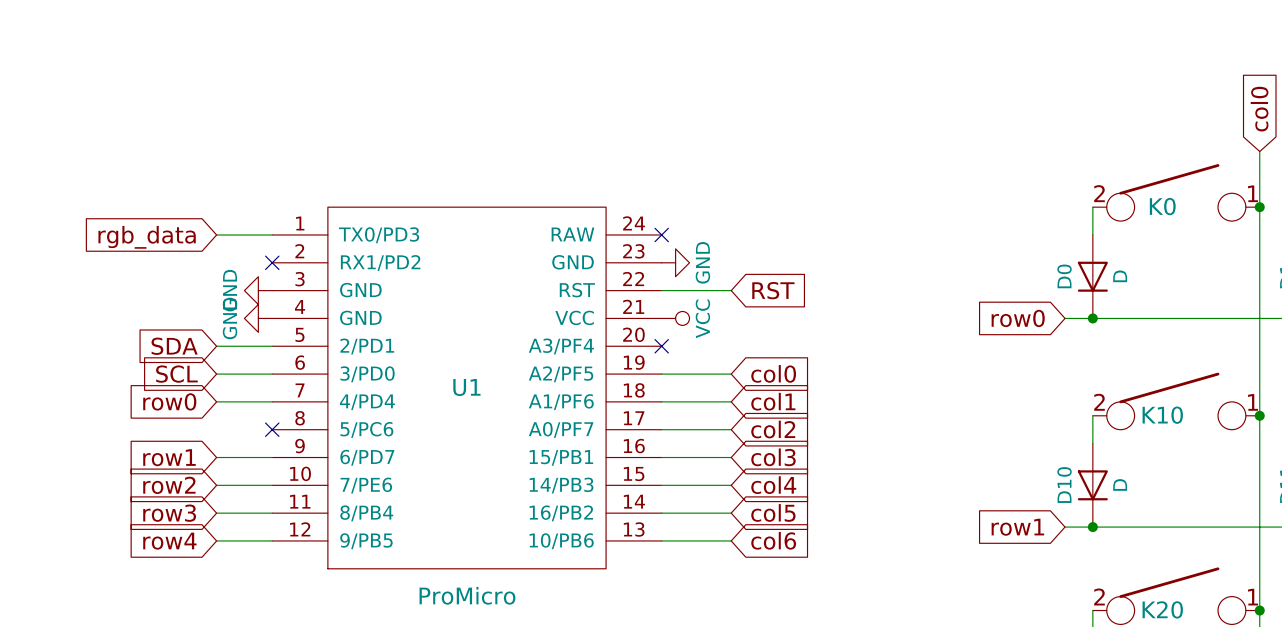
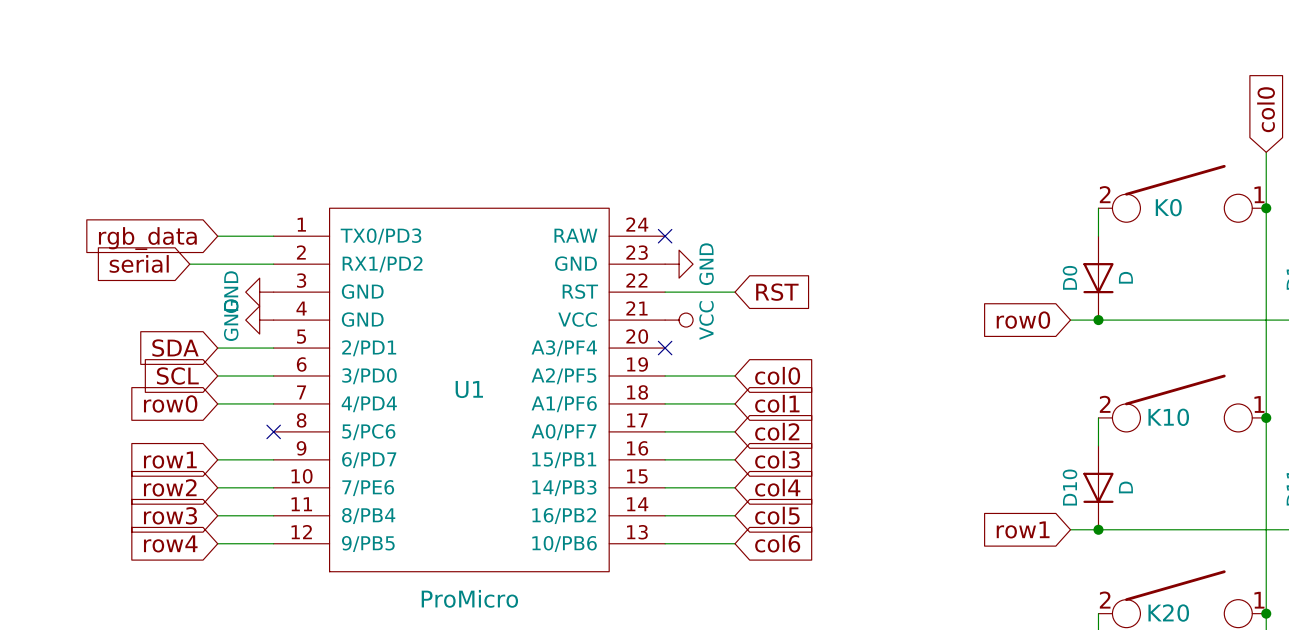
global label: none -> serial (139, 263)
wire: none -> (189, 264) (273, 264)
no-connect mark: (272, 262) -> none

